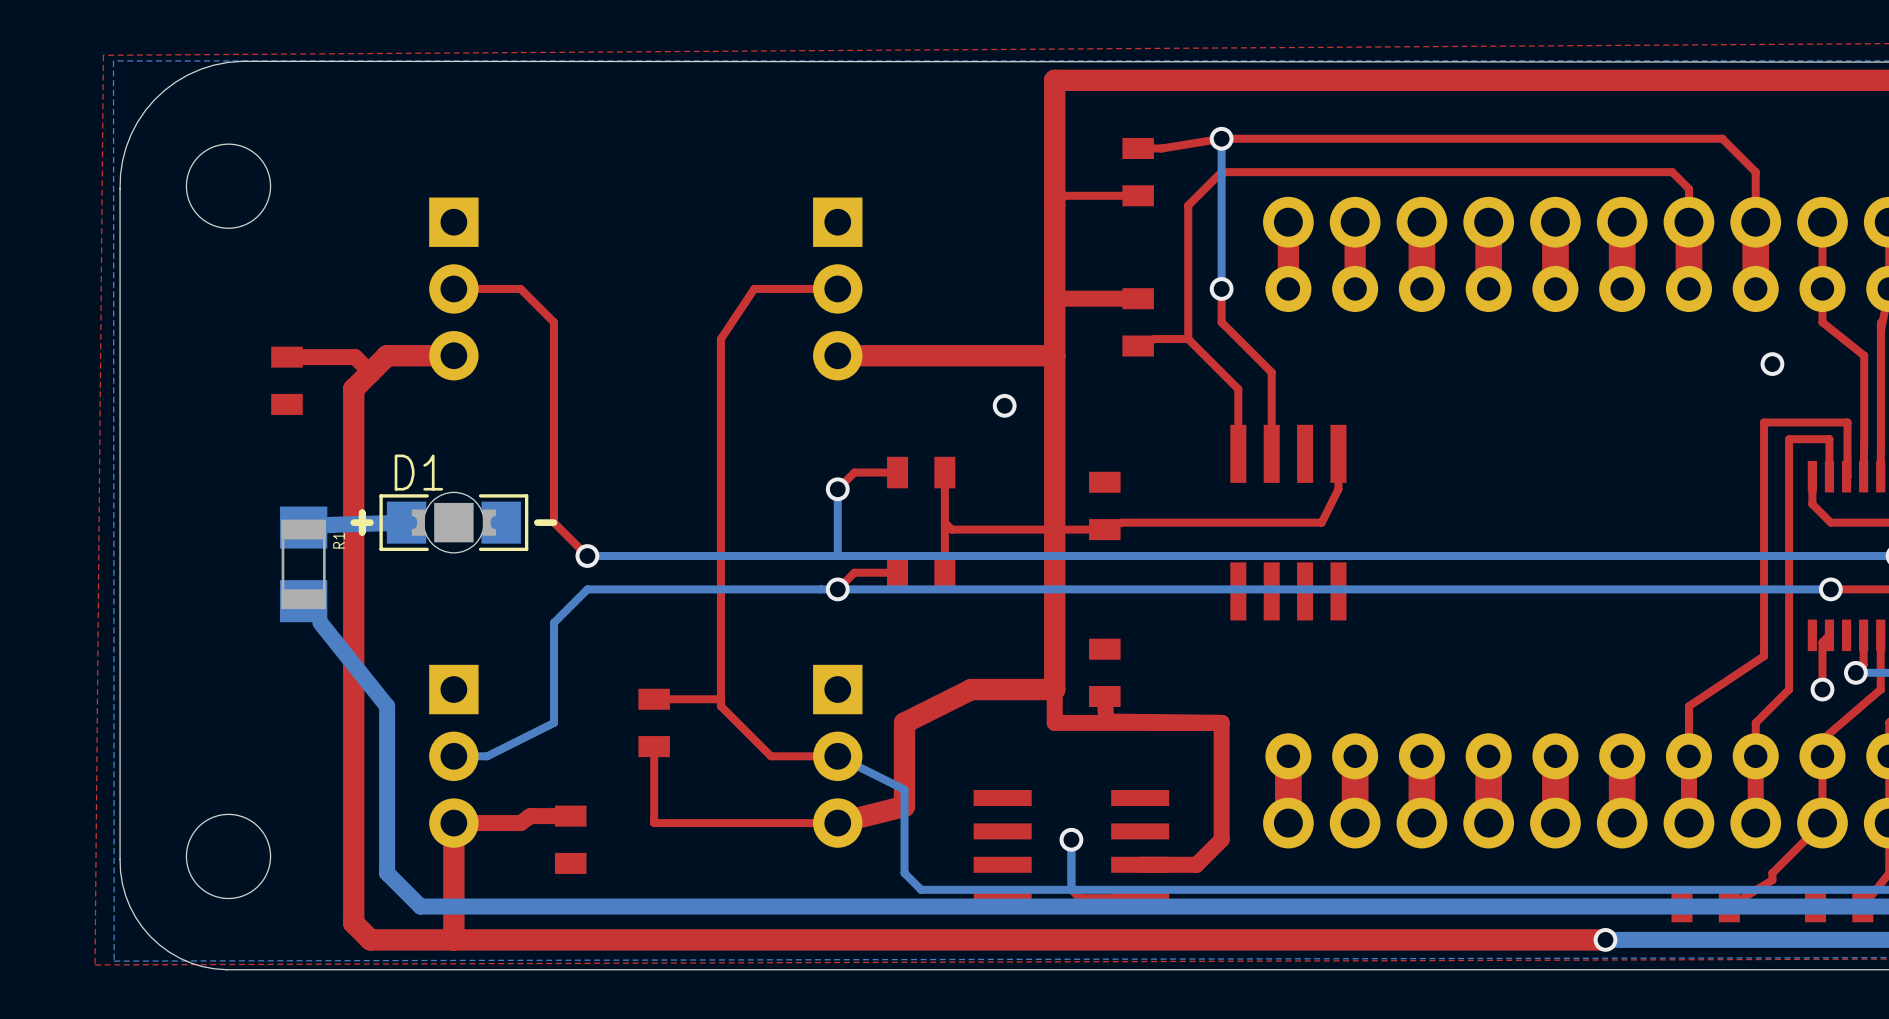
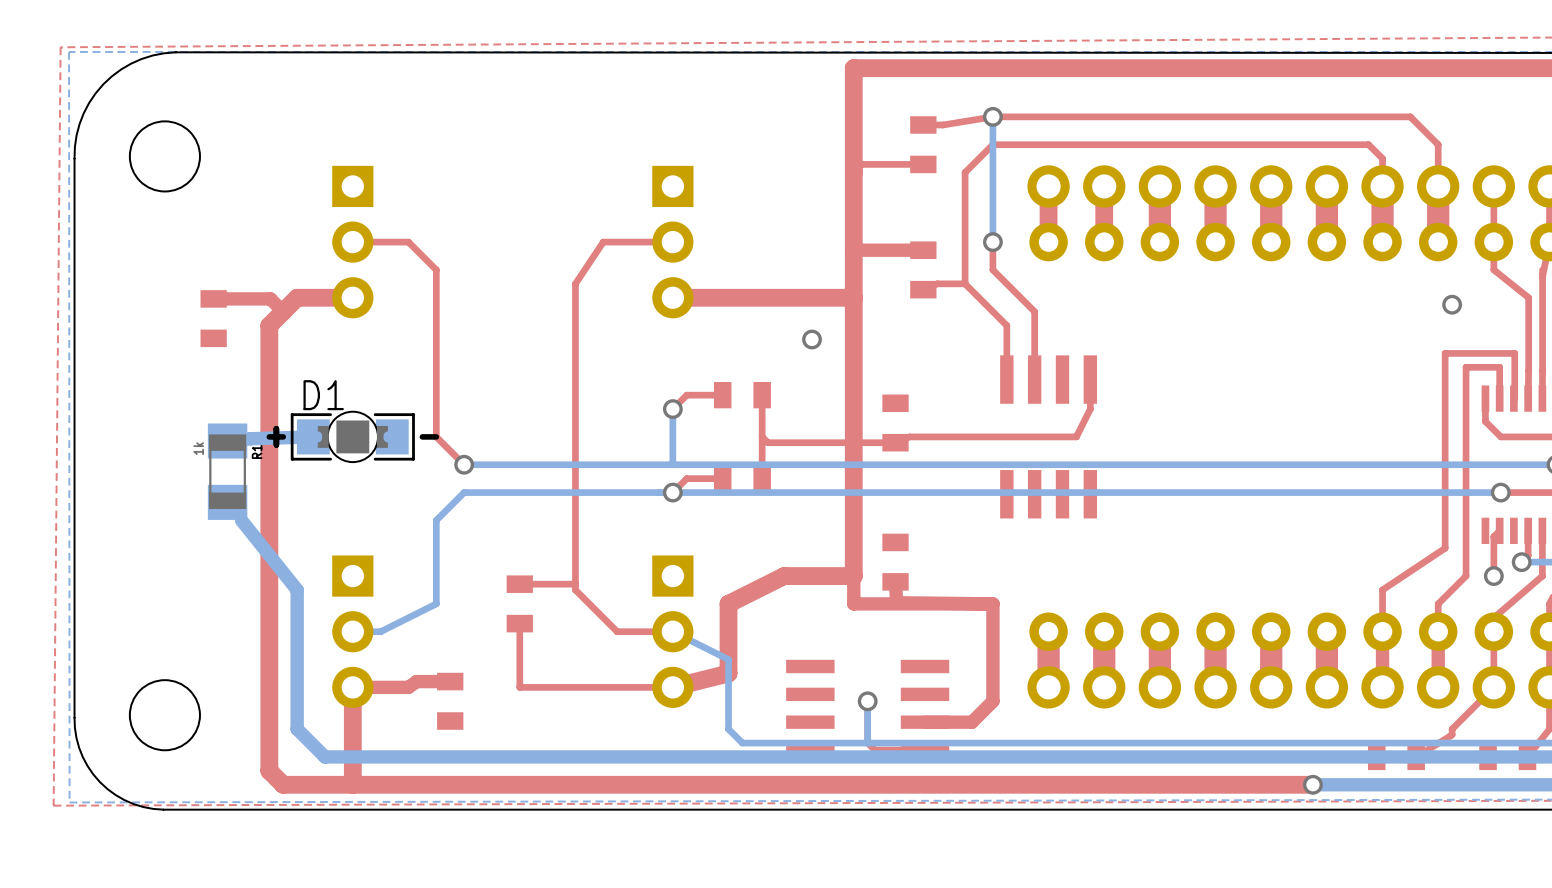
R1 value: none -> 1k (198, 448)

